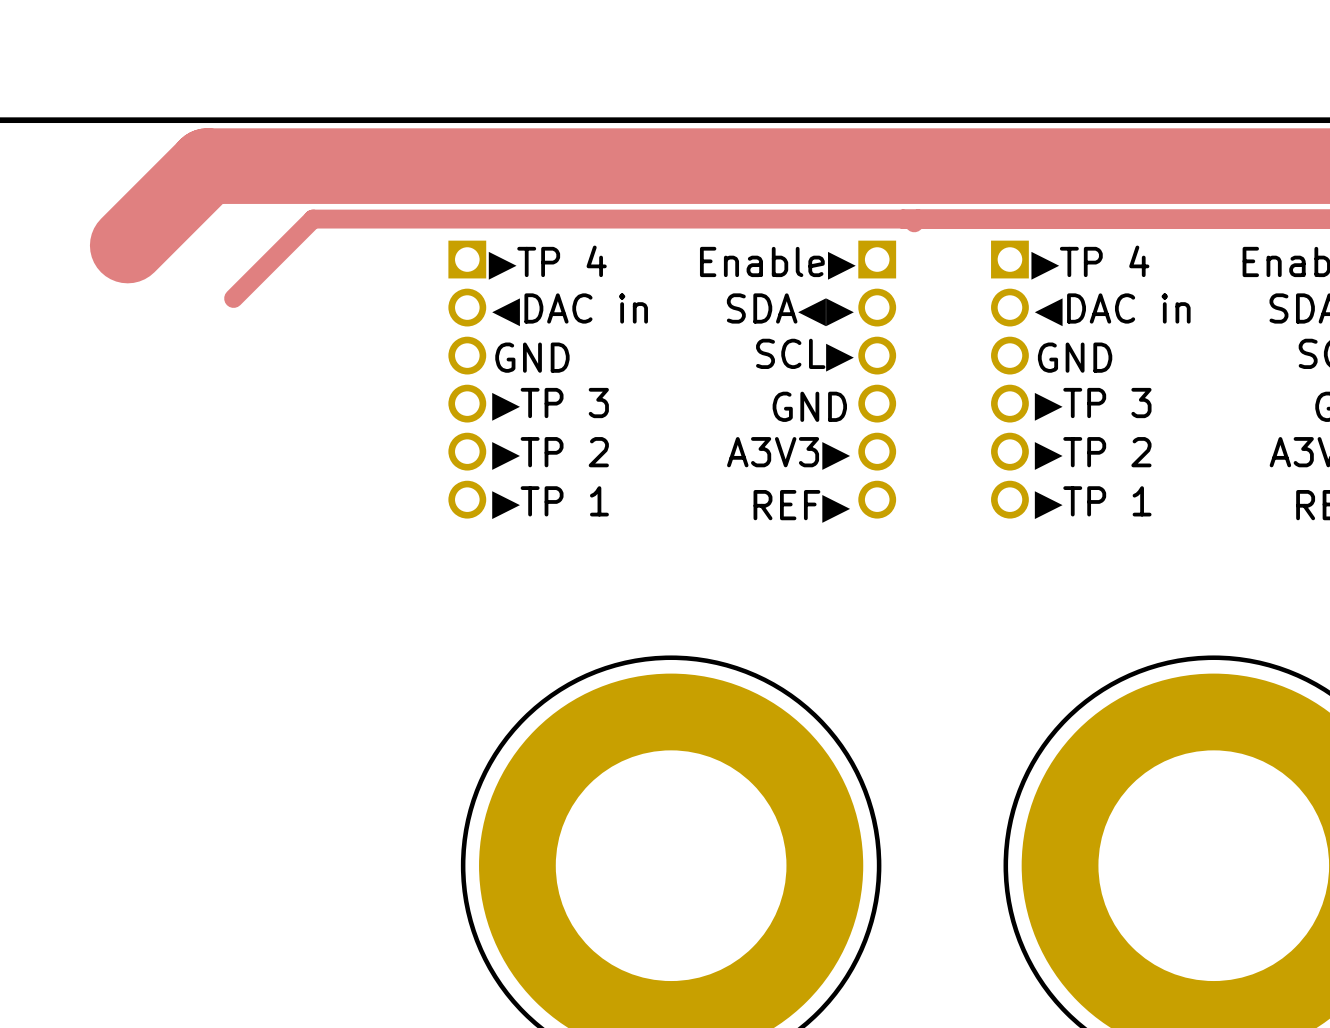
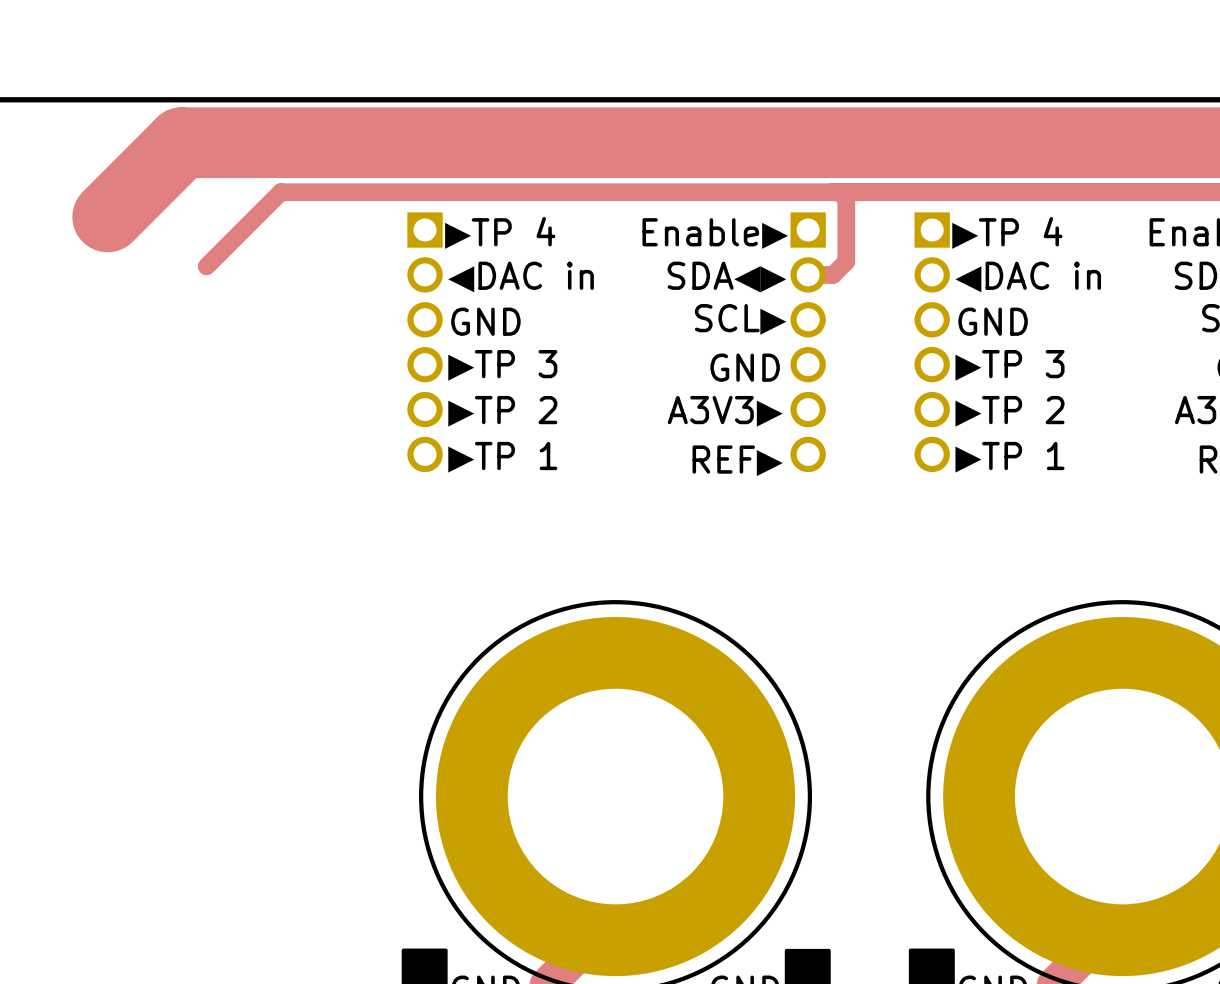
track: none -> (846, 192) (846, 261) (833, 274) (808, 274)

